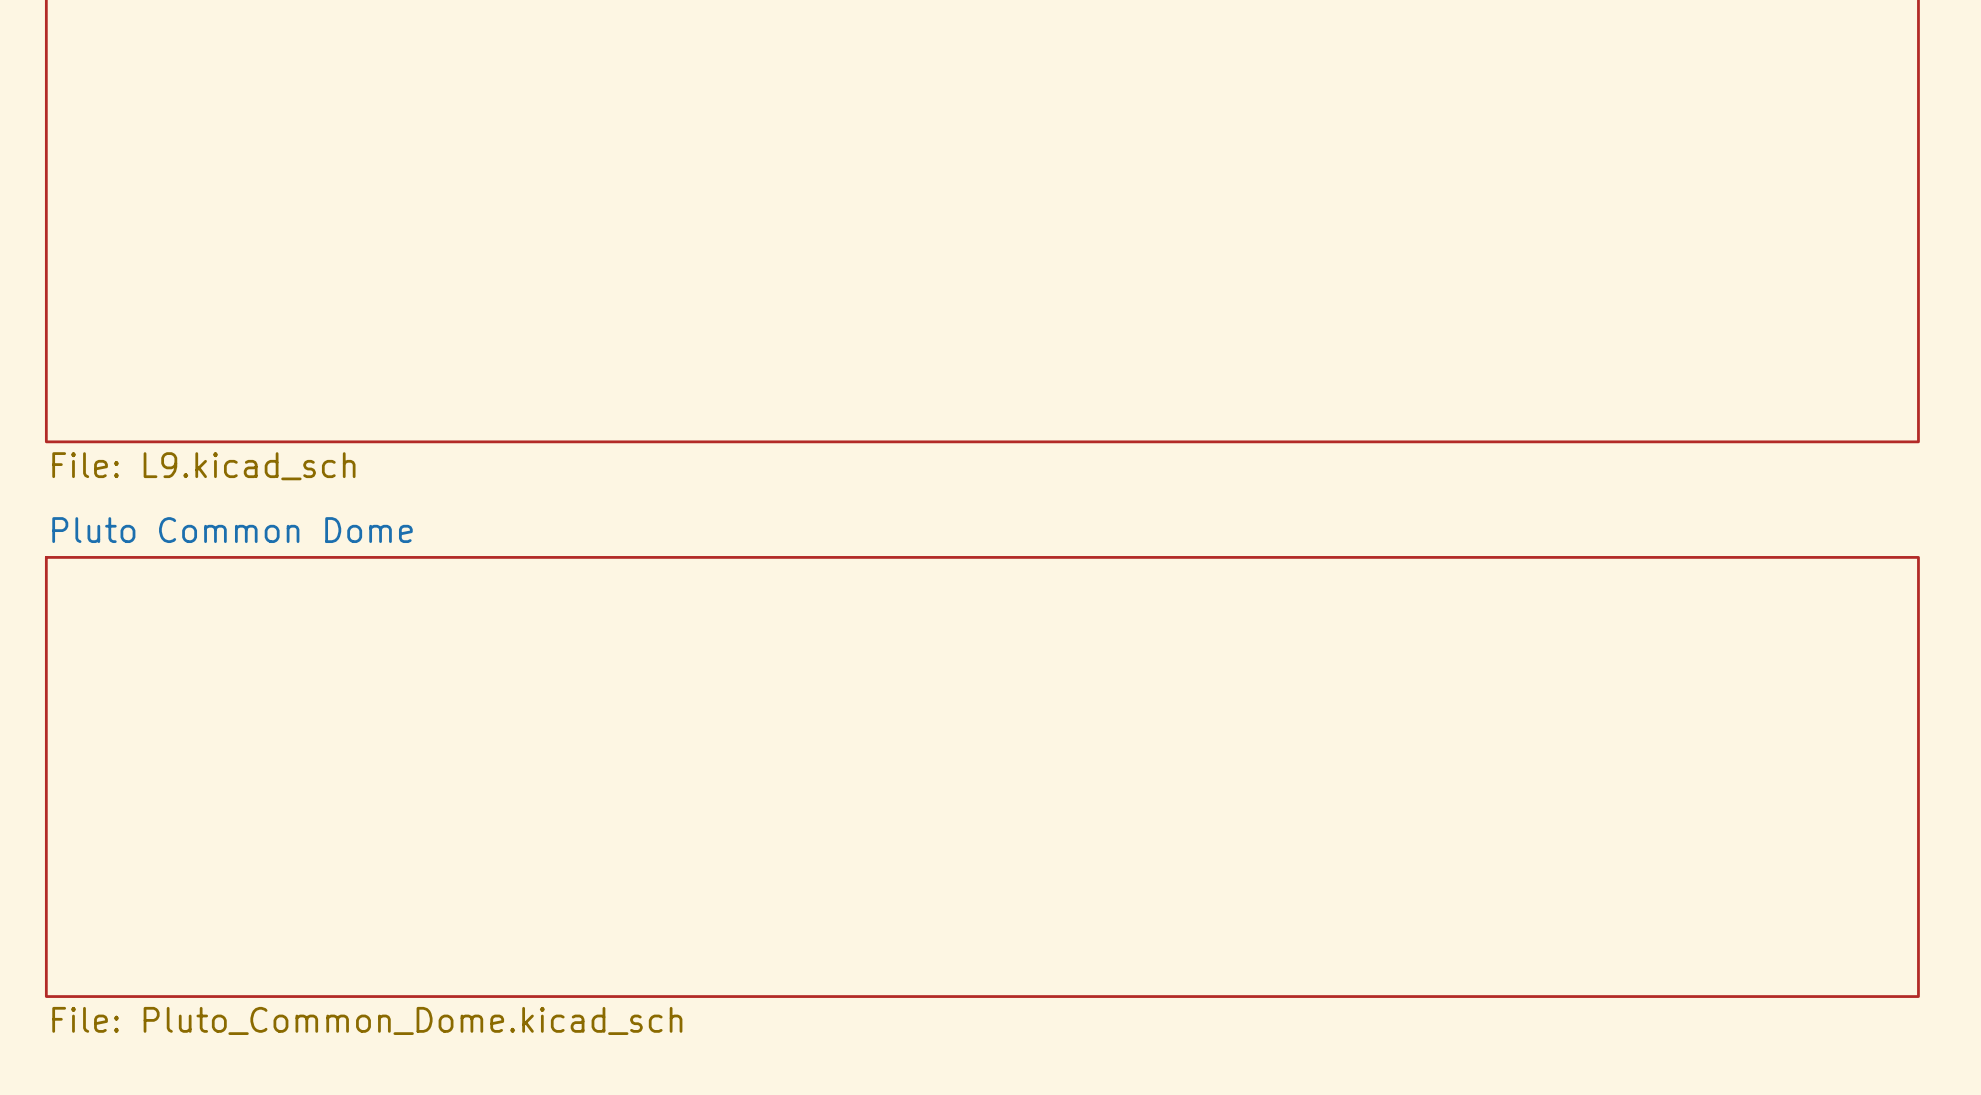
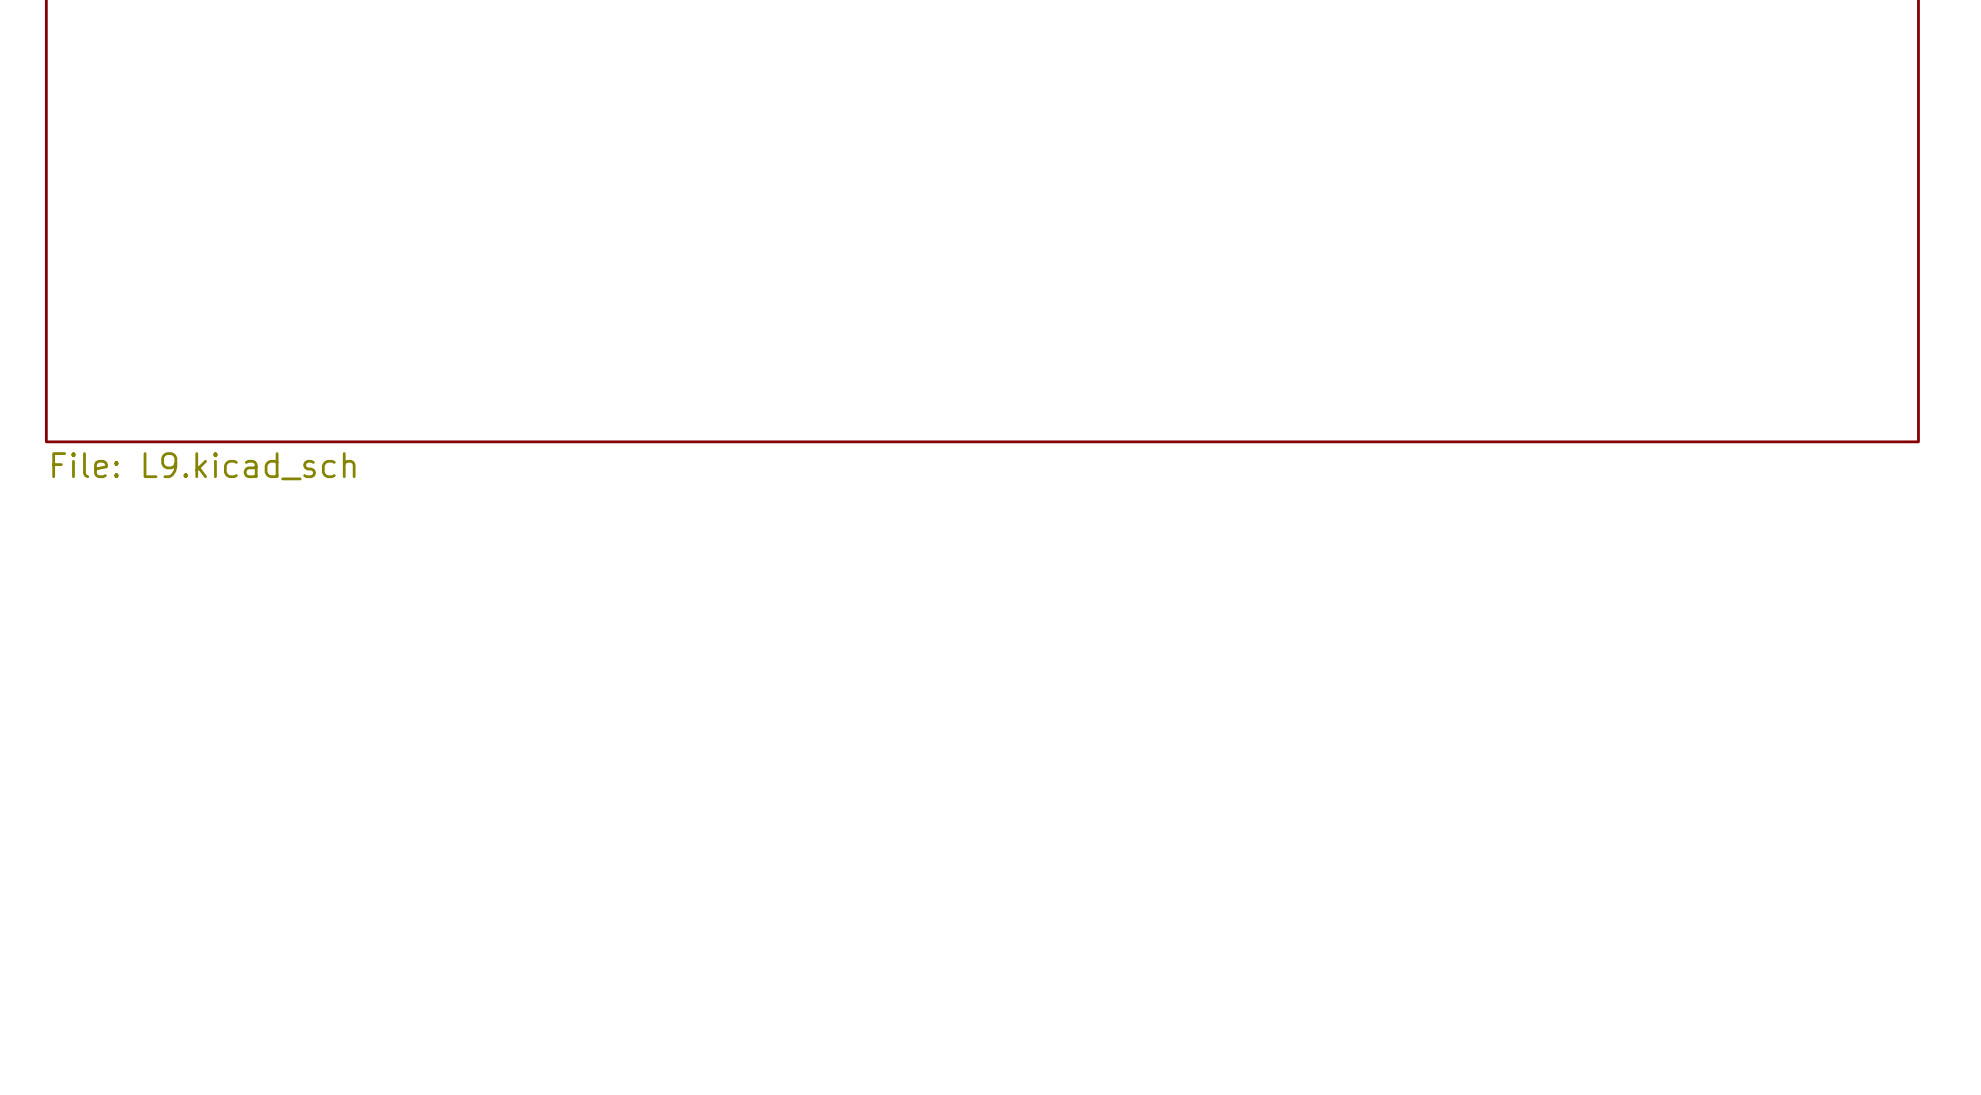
sheet Pluto Common Dome: File: Pluto_Common_Dome.kicad_sch (982, 776) -> none

